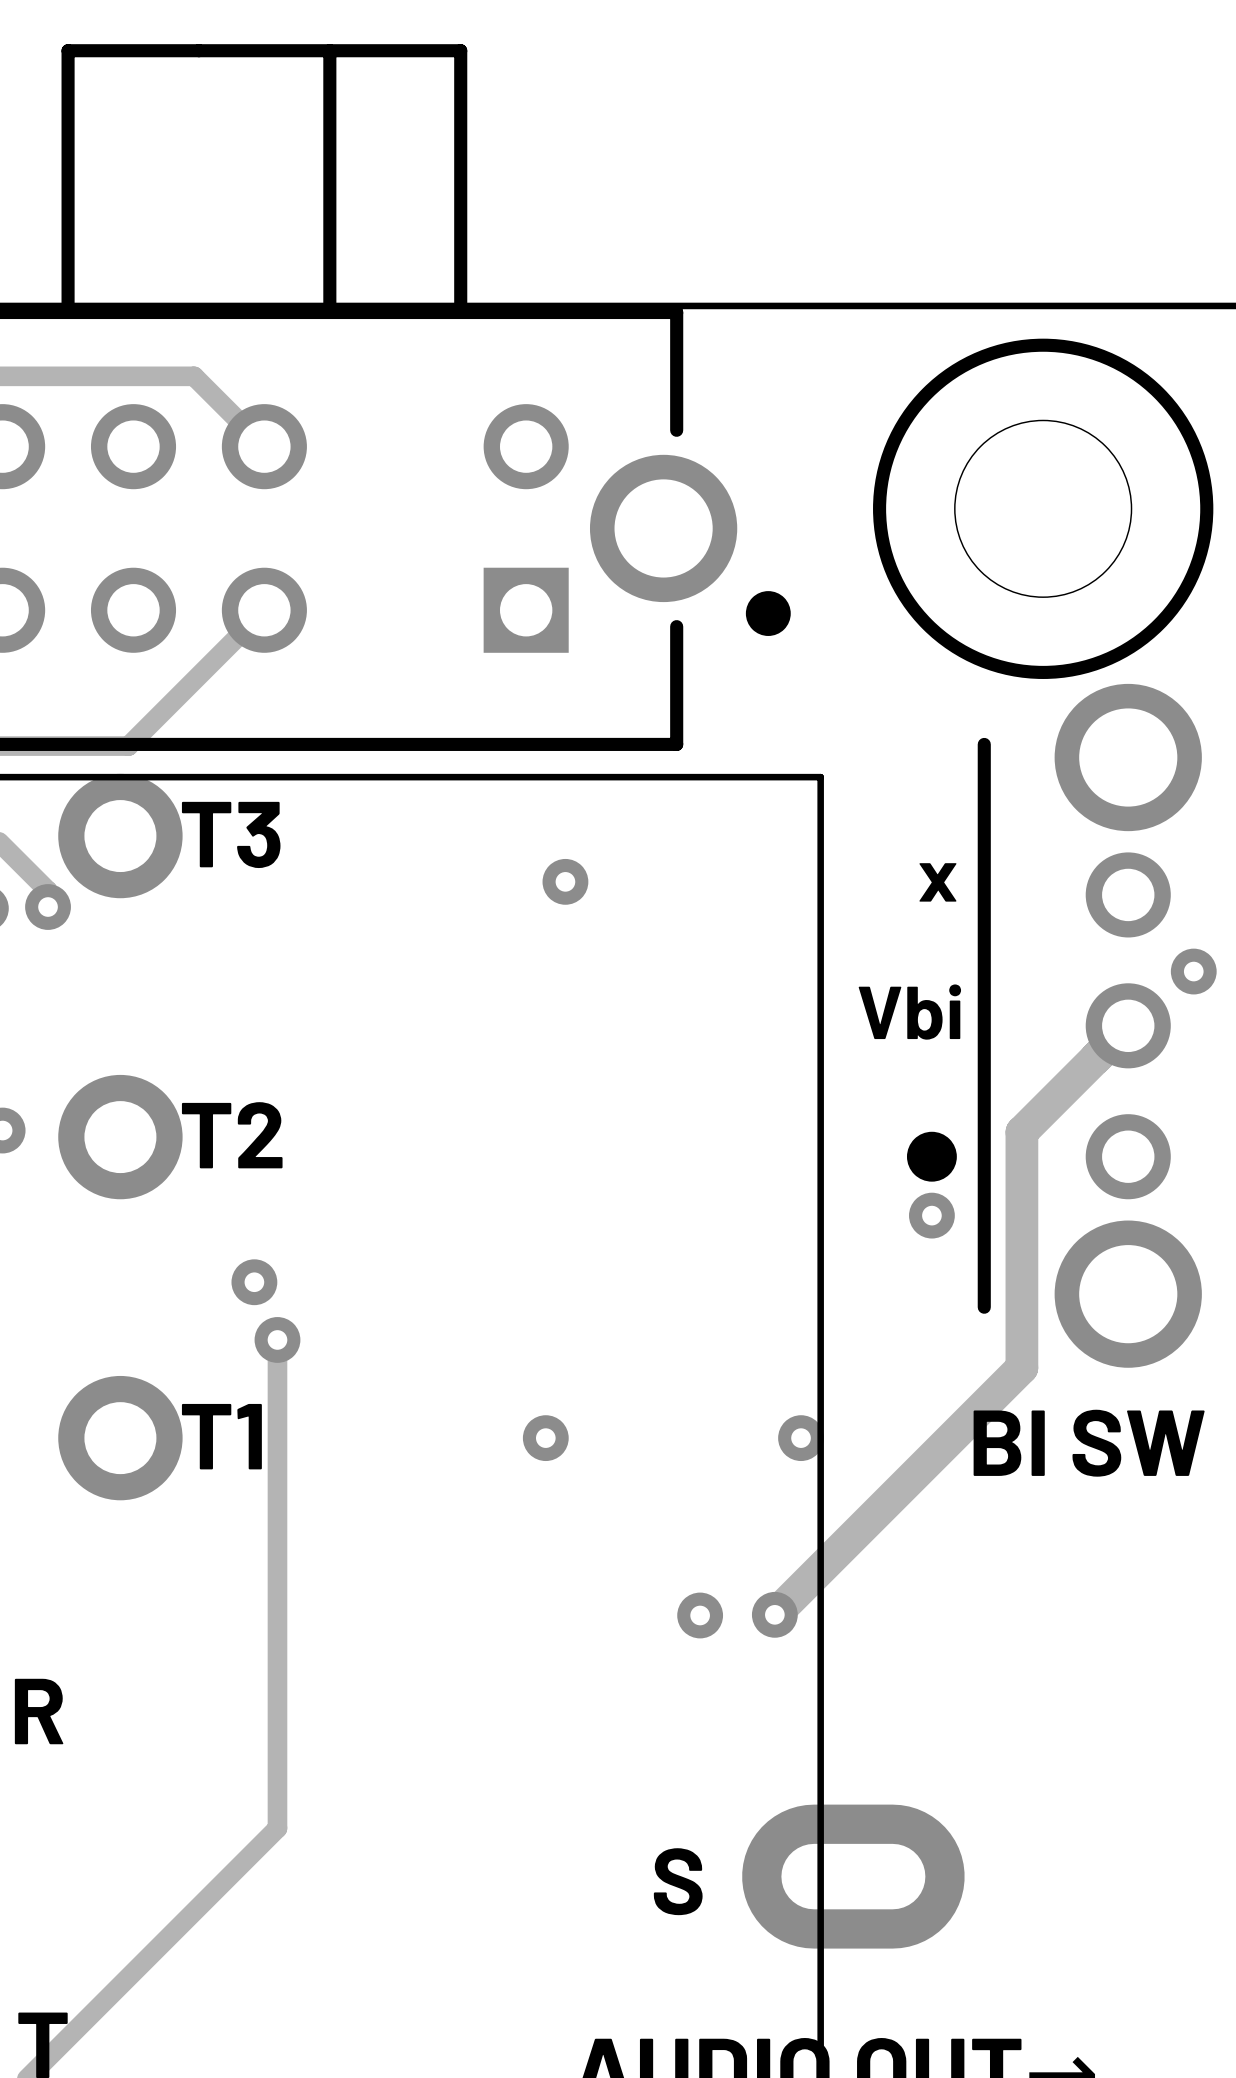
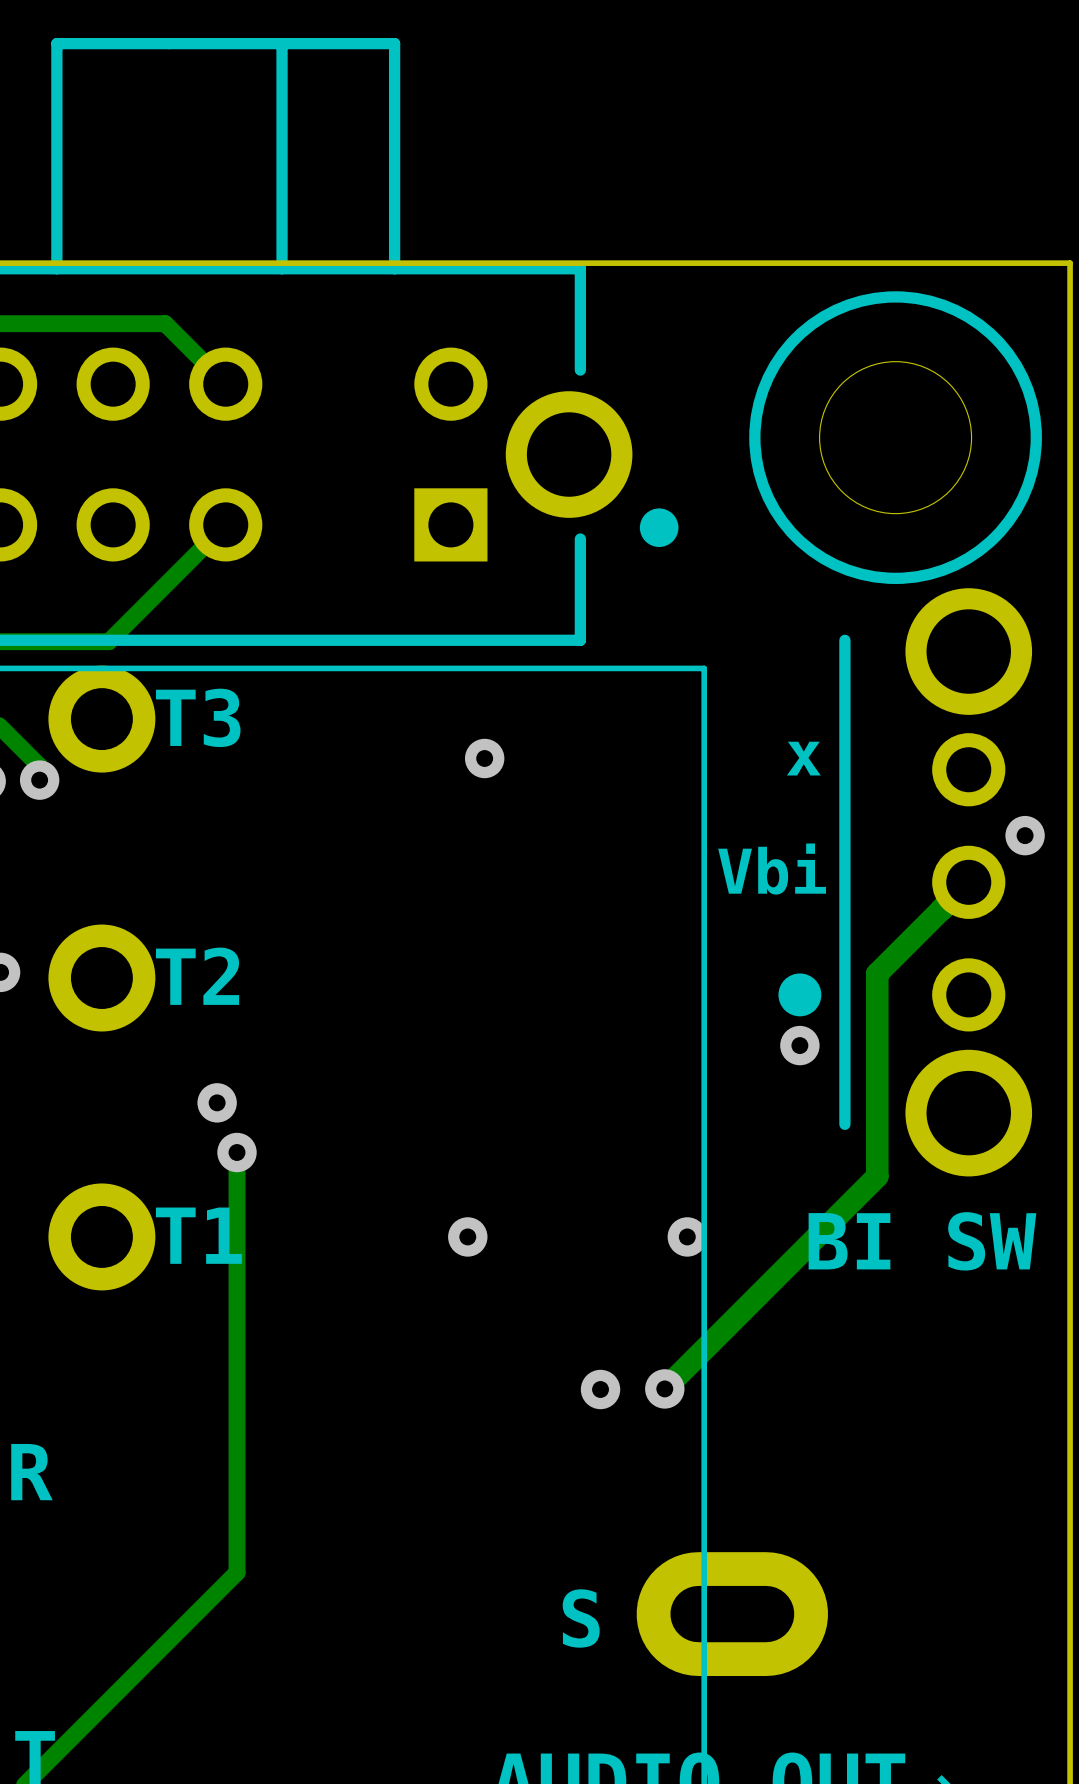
track width: thick (1128, 1025) (1021, 1132) (1021, 1367) (774, 1614) -> thin (968, 882) (877, 973) (877, 1176) (664, 1388)

